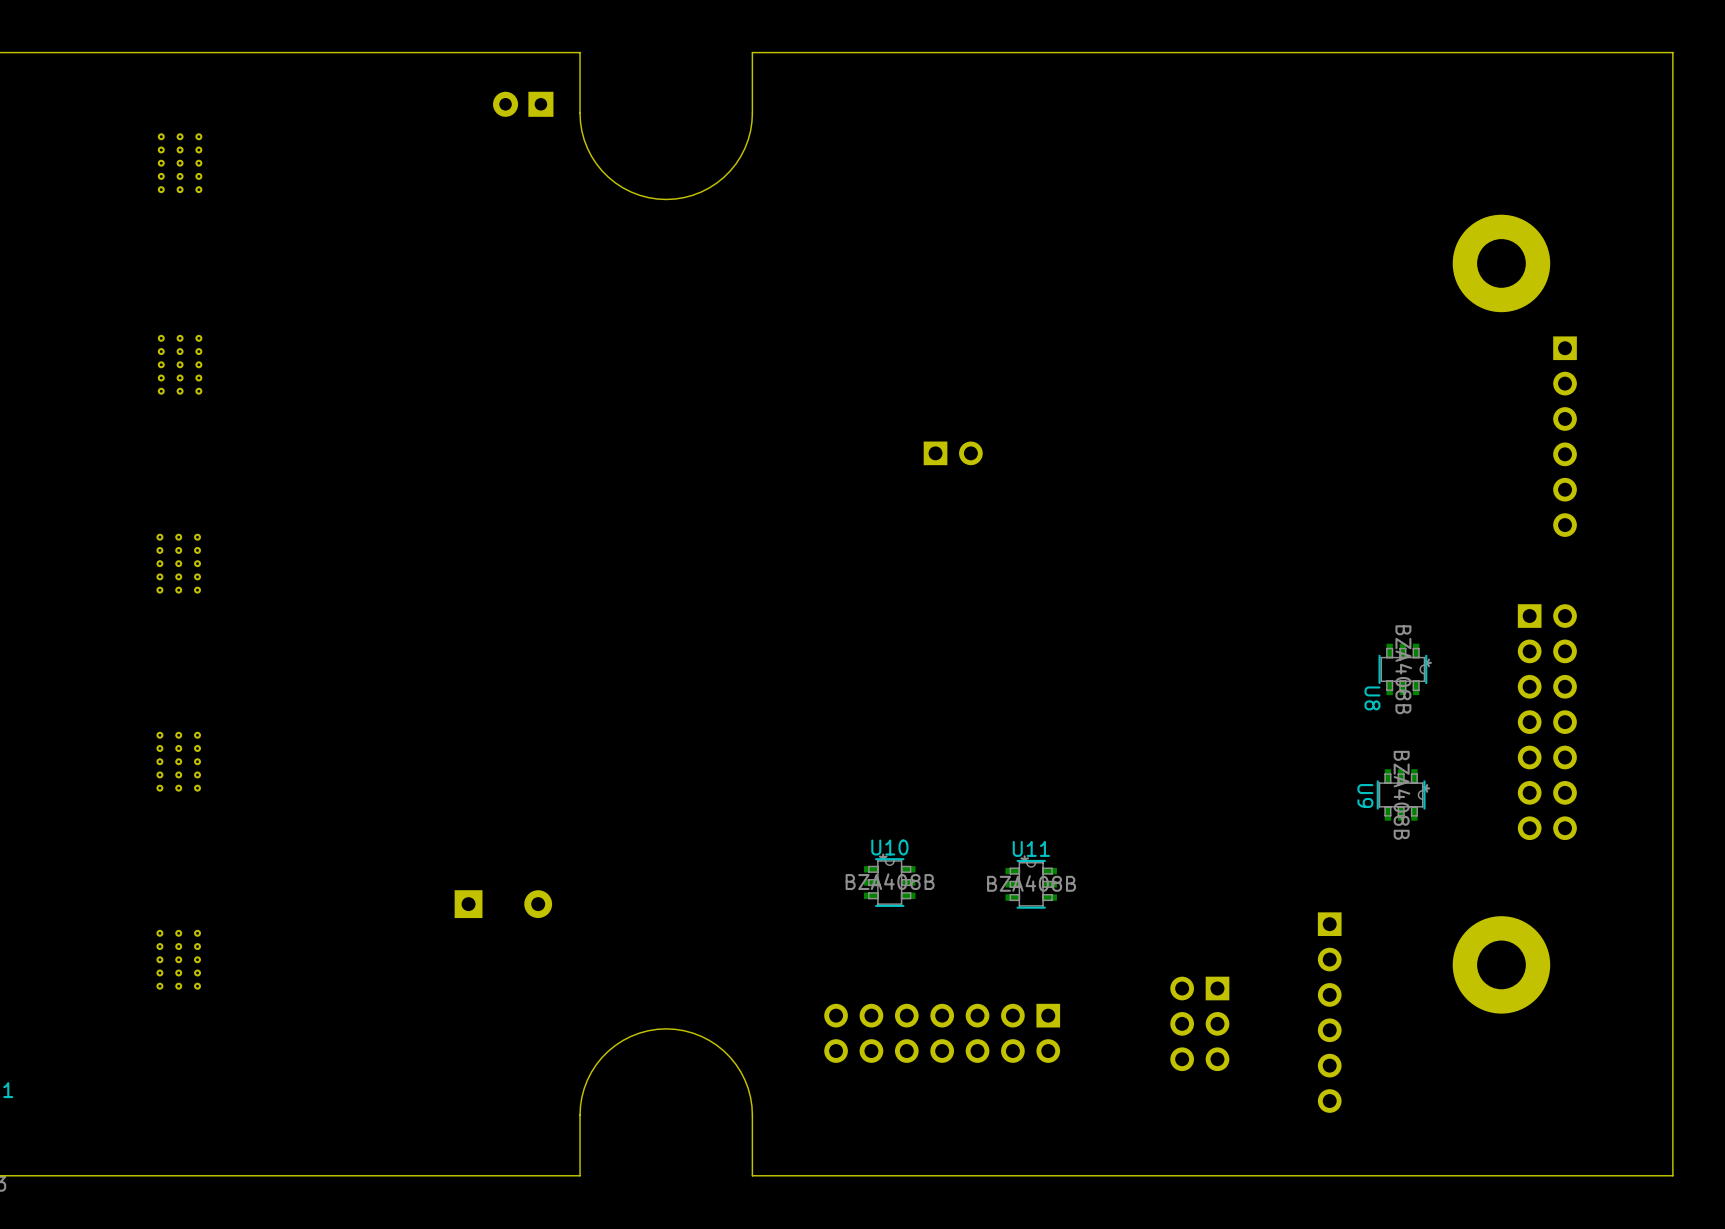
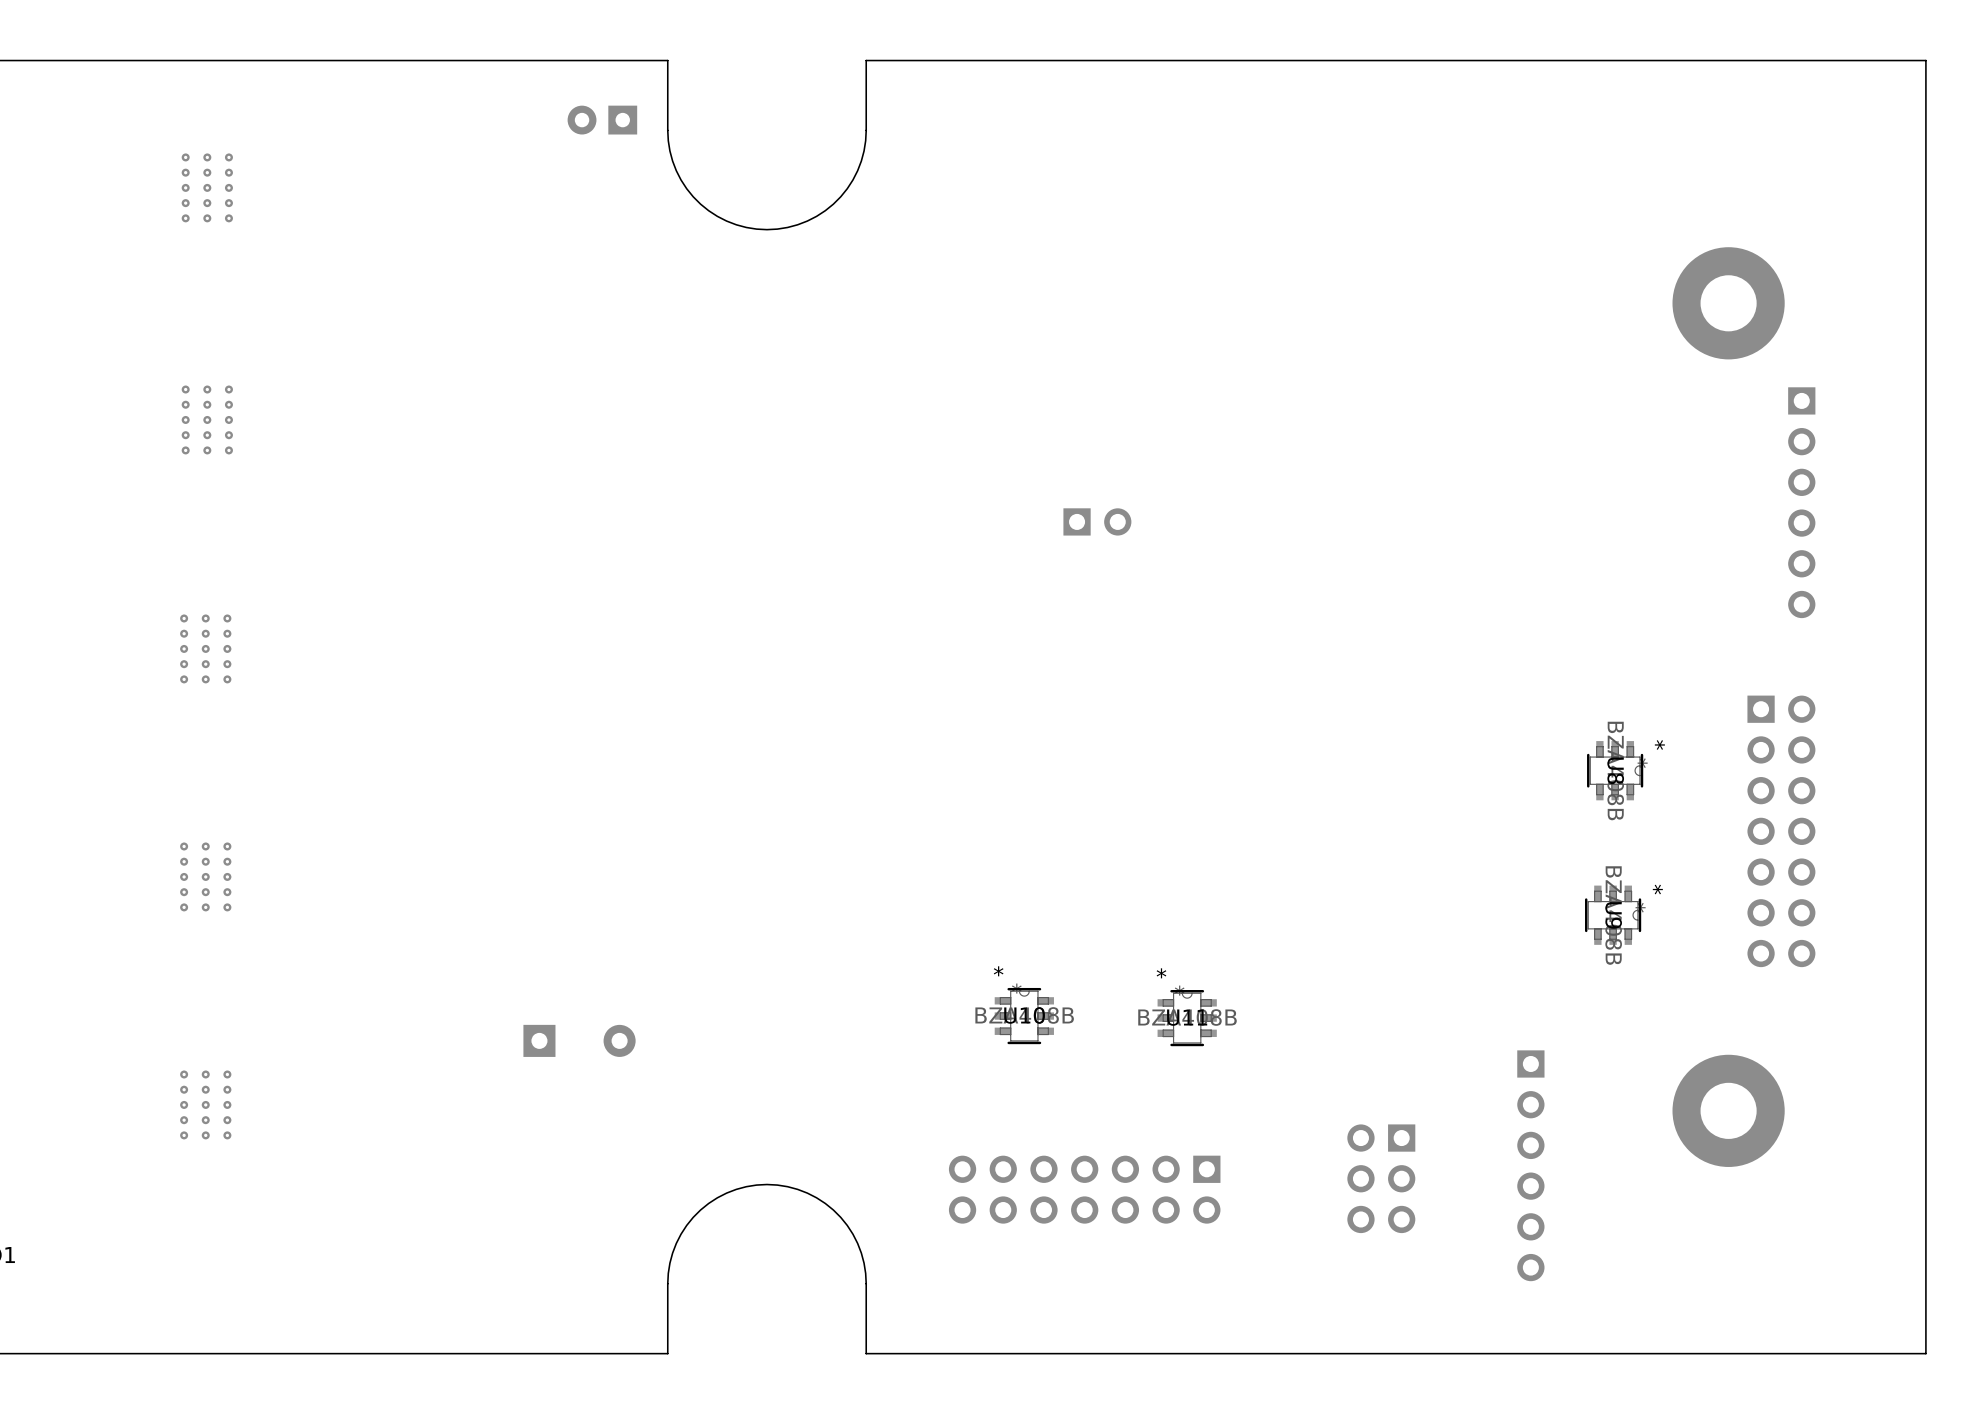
U8 text: none -> * (1659, 744)
U8 name position: U8 (1372, 698) -> U8 (1615, 770)
U9 text: none -> * (1657, 889)
U9 name position: U9 (1365, 796) -> U9 (1613, 915)
U10 text: none -> * (998, 971)
U11 text: none -> * (1161, 973)
U10 name position: U10 (889, 847) -> U10 (1024, 1015)
U11 name position: U11 (1031, 848) -> U11 (1187, 1017)

